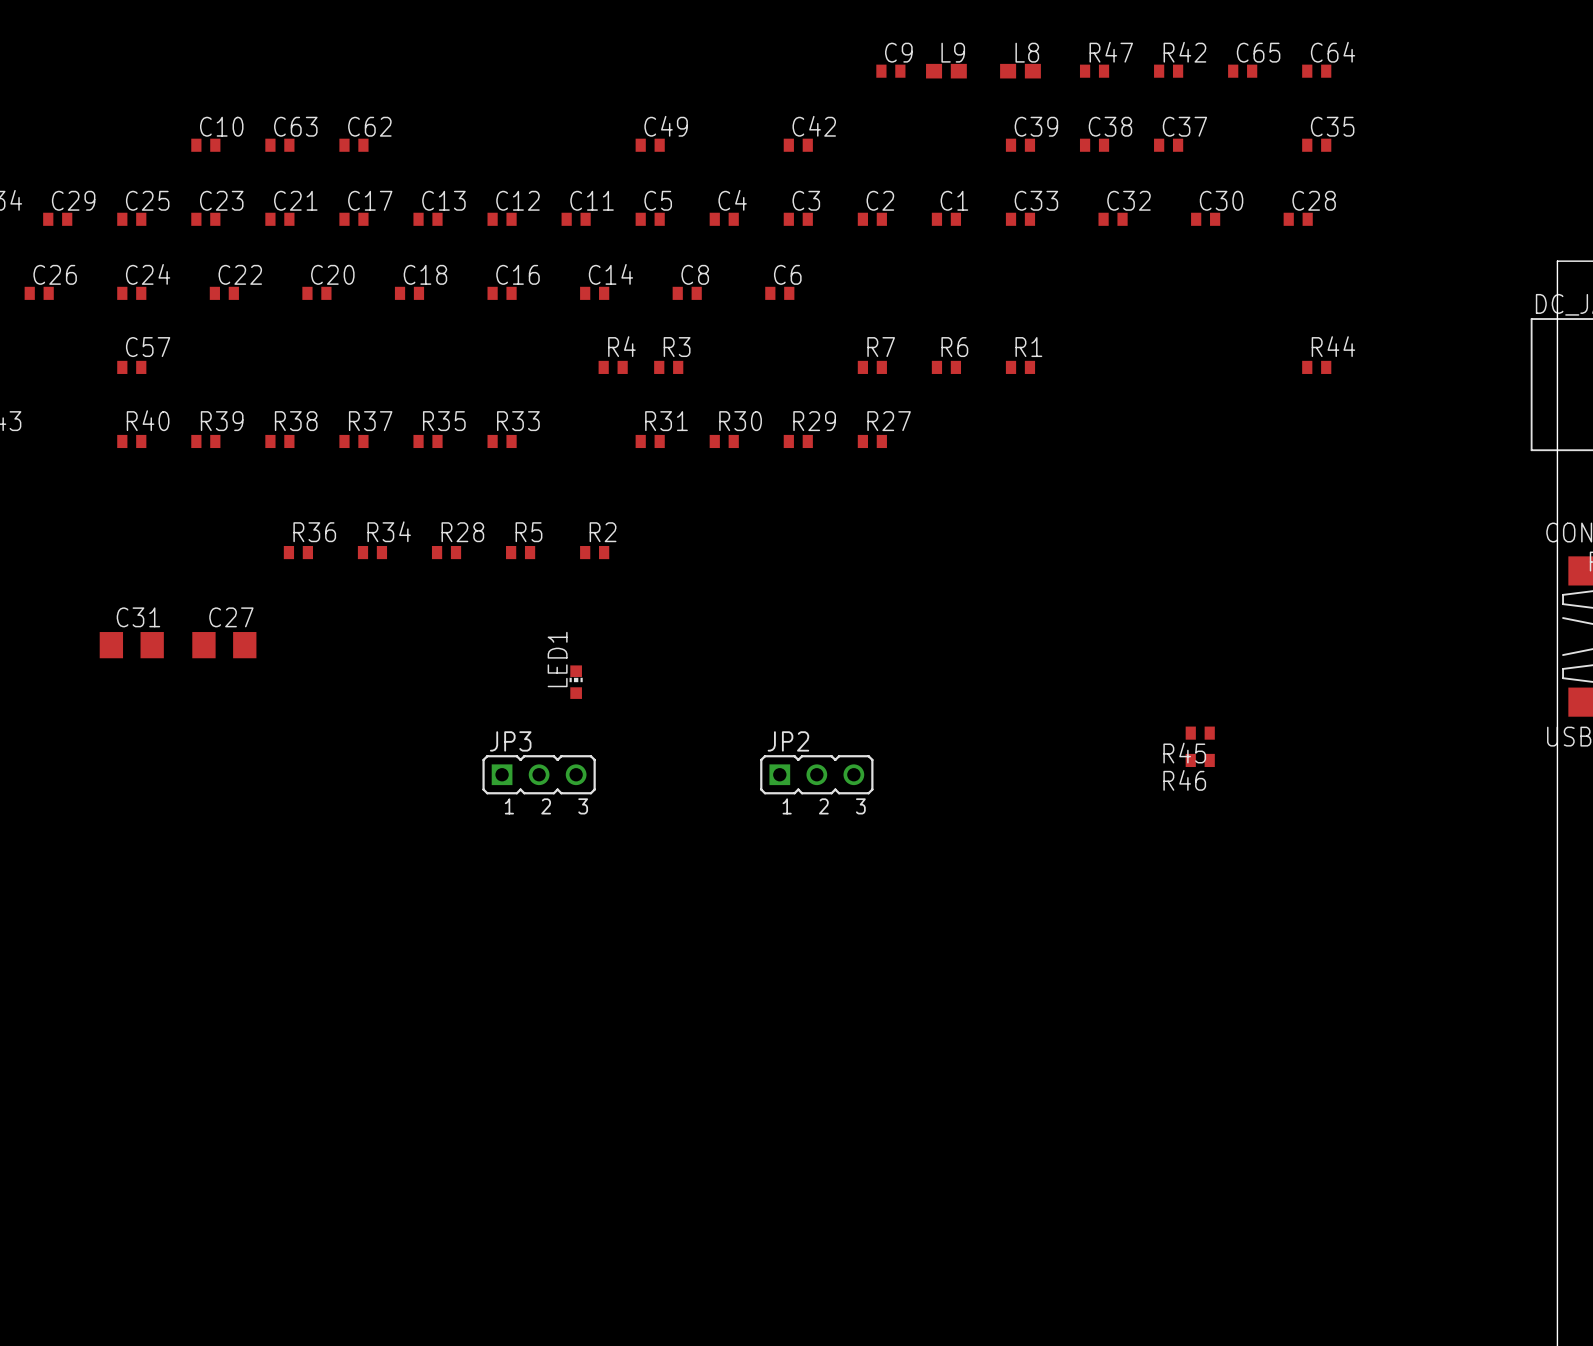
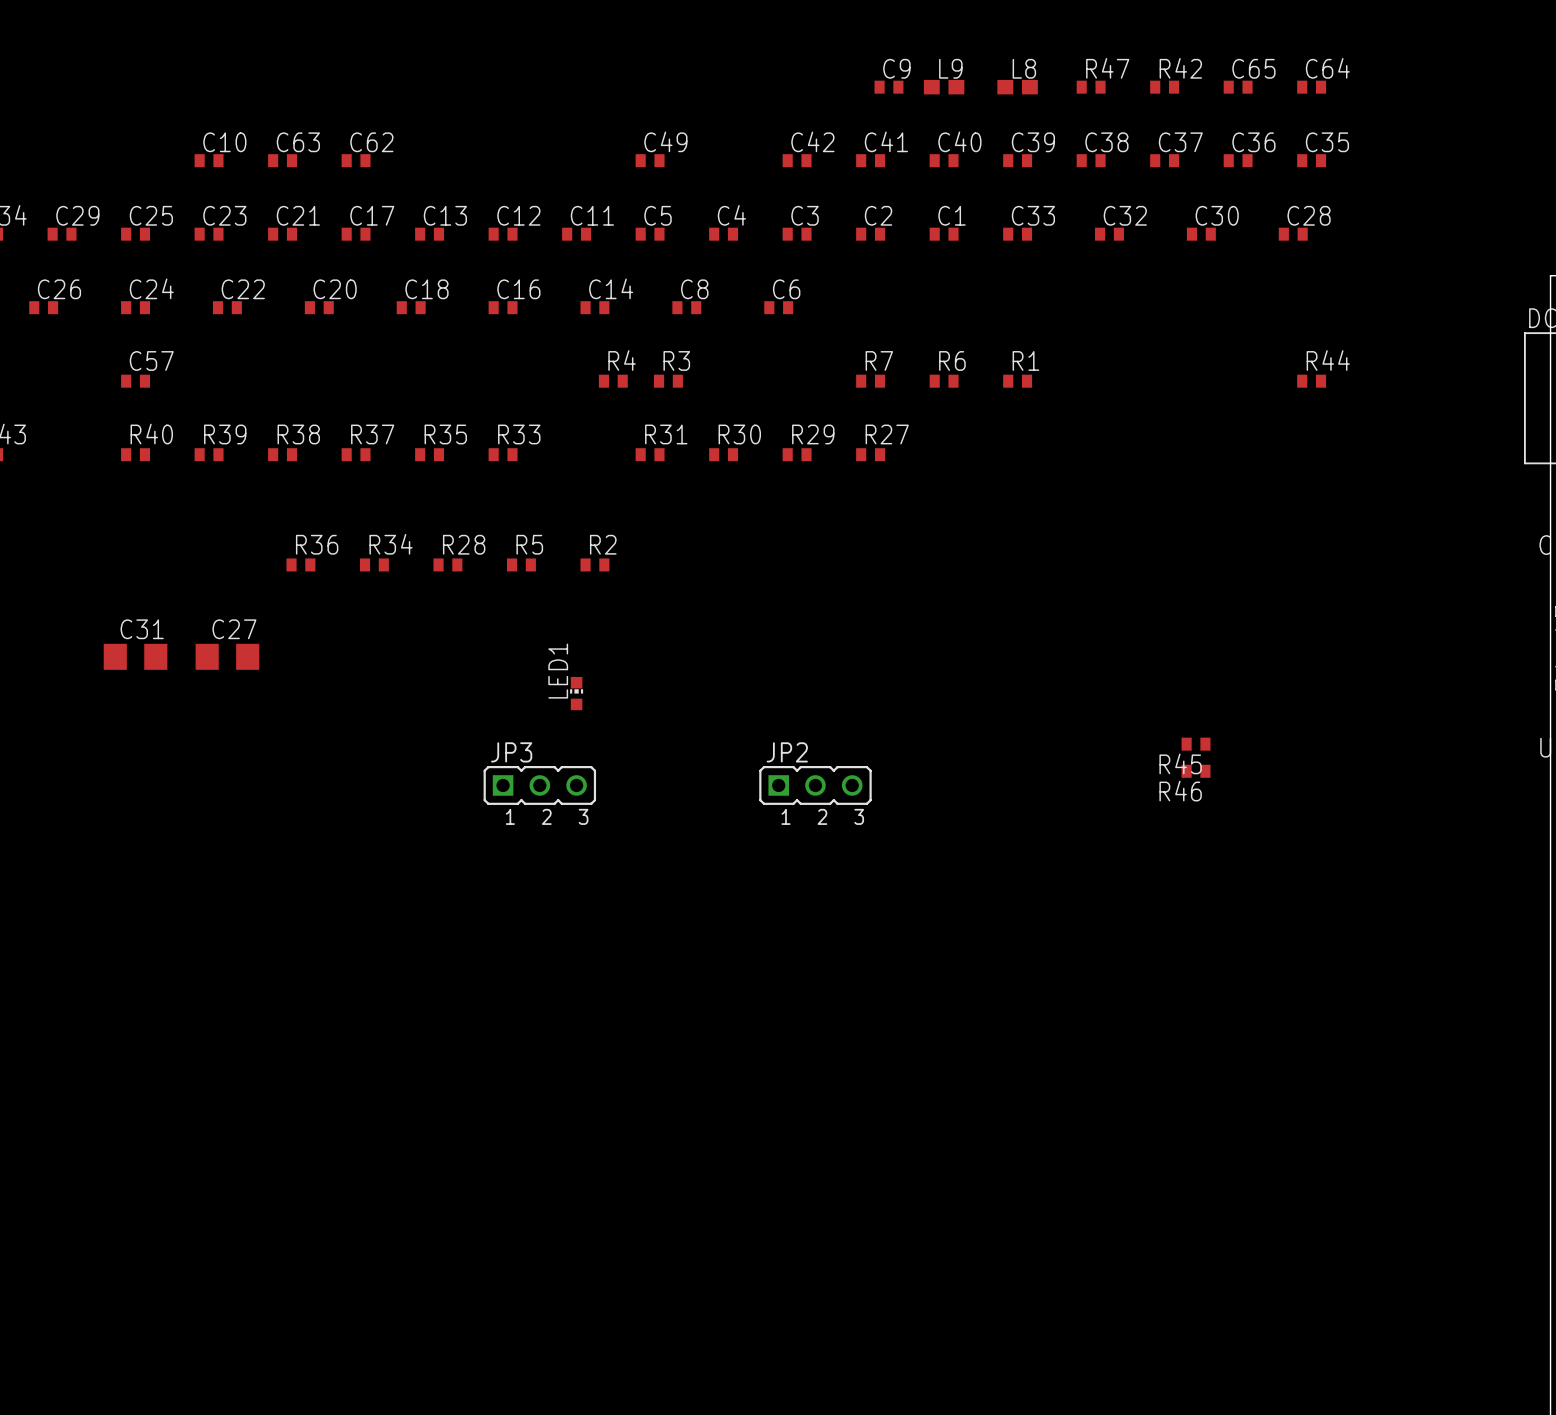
C41: none -> (870, 160)
C40: none -> (944, 160)
C36: none -> (1238, 160)

